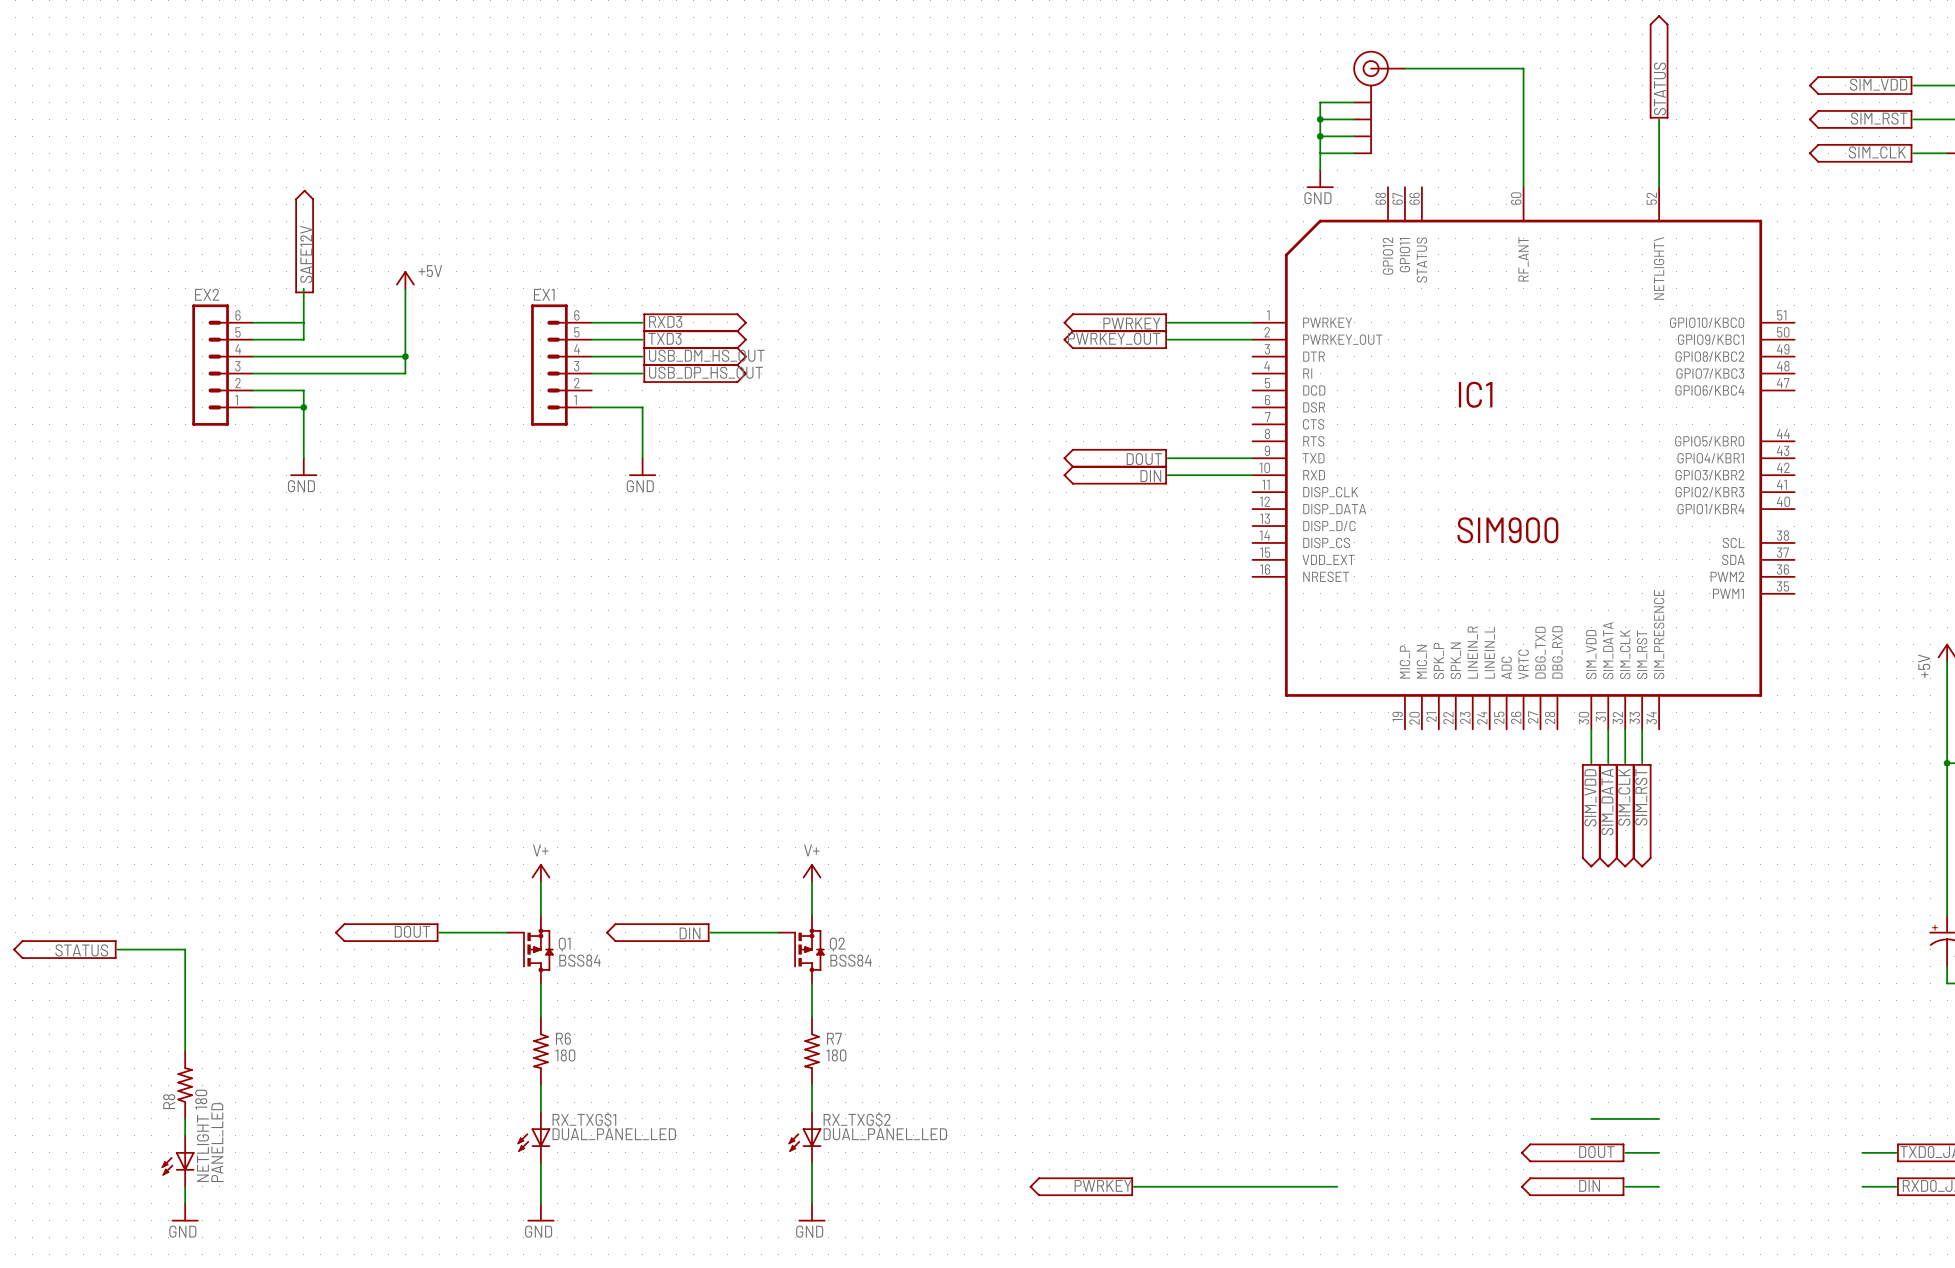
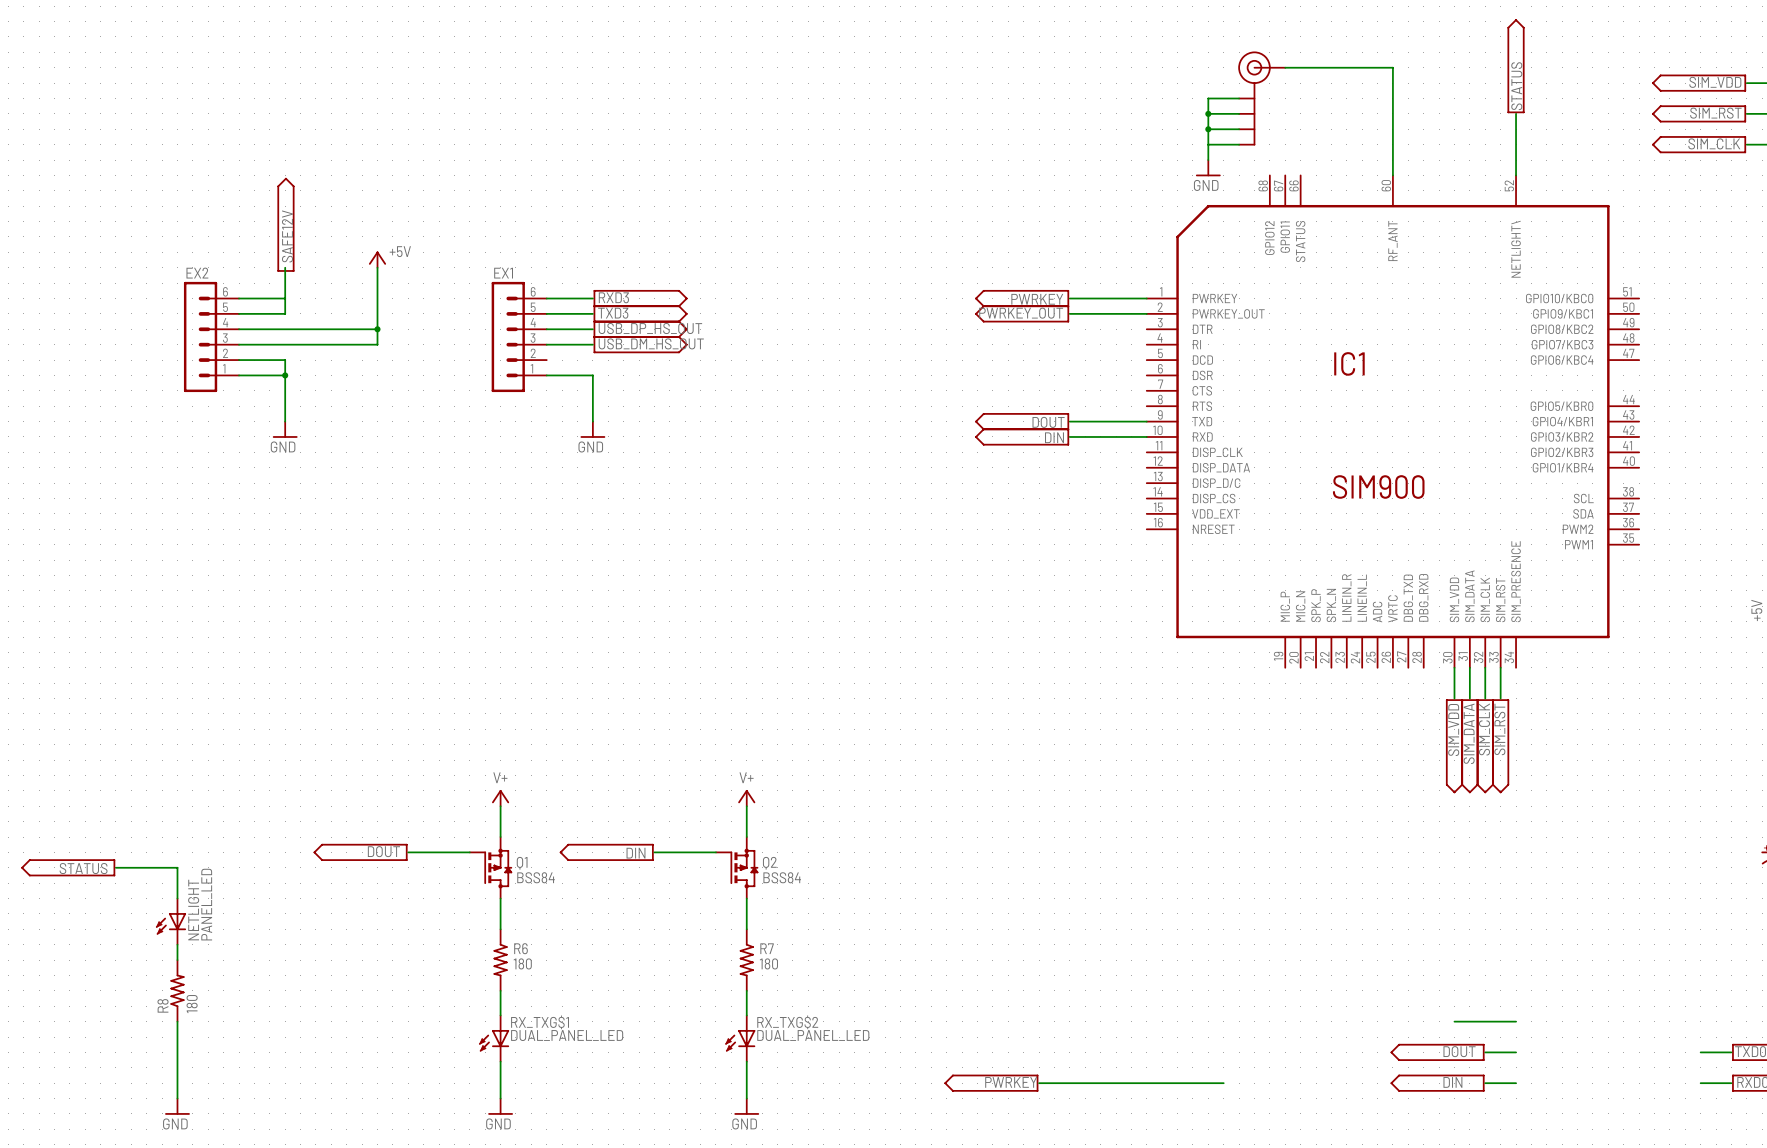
label: USB_DM_HS_OUT (706, 355) -> USB_DP_HS_OUT (650, 328)
label: USB_DP_HS_OUT (705, 372) -> USB_DM_HS_OUT (651, 343)
NETLIGHT position: (178, 1161) -> (171, 921)

